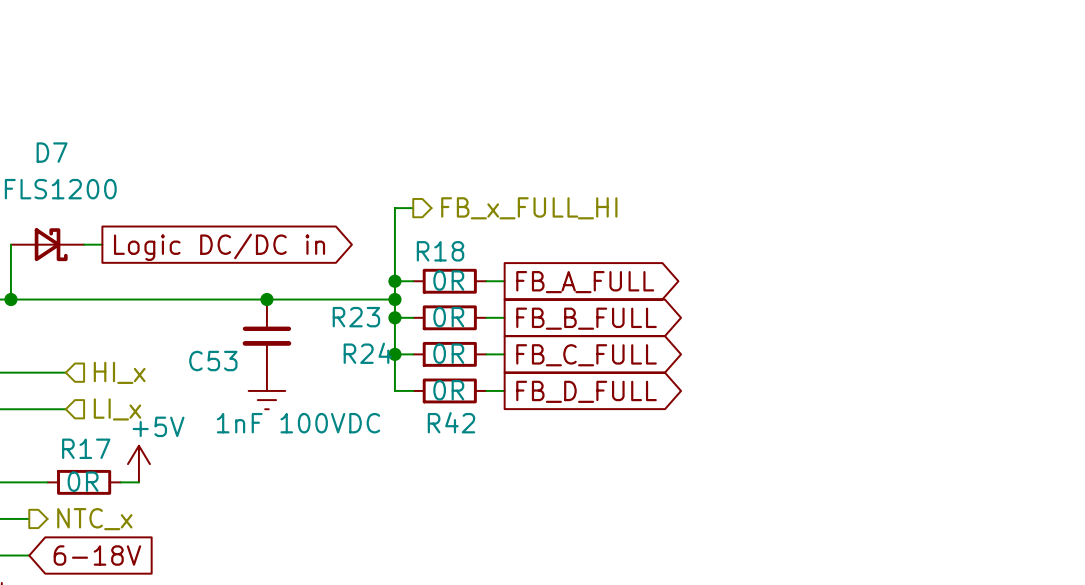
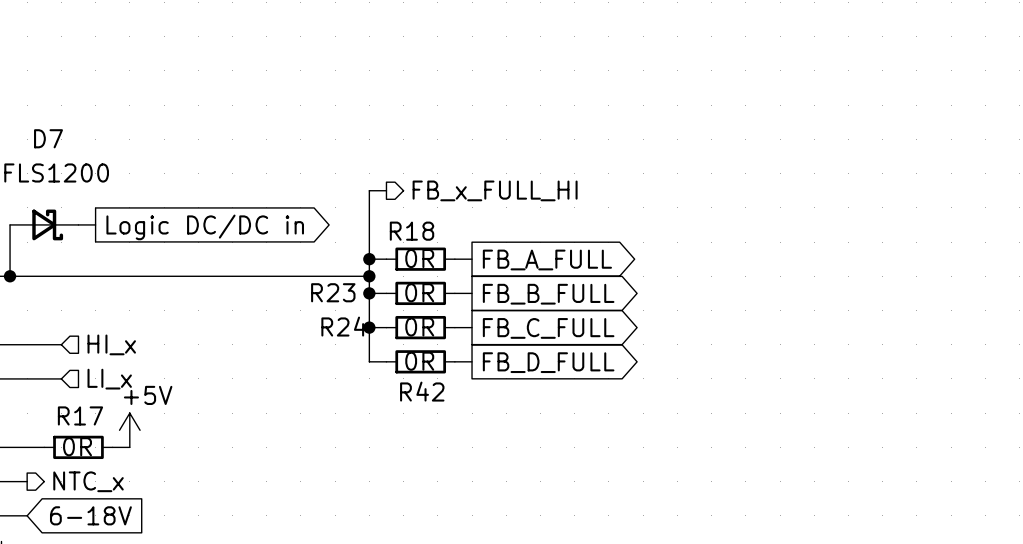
junction: (266, 299) -> none
C53: 1nF 100VDC (266, 336) -> none
power symbol: (266, 390) -> none

